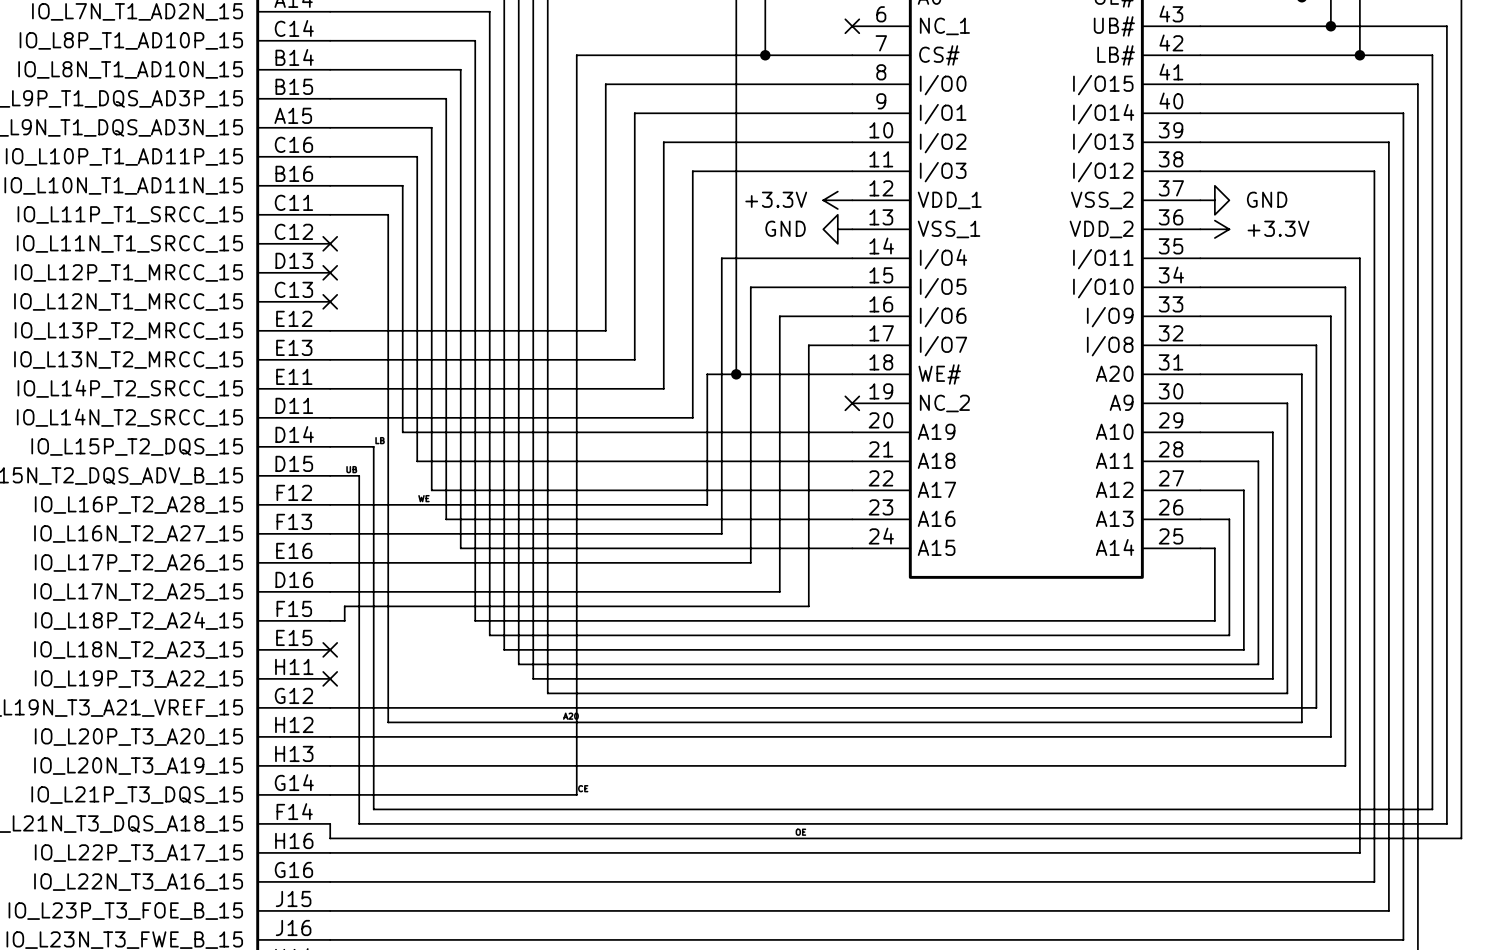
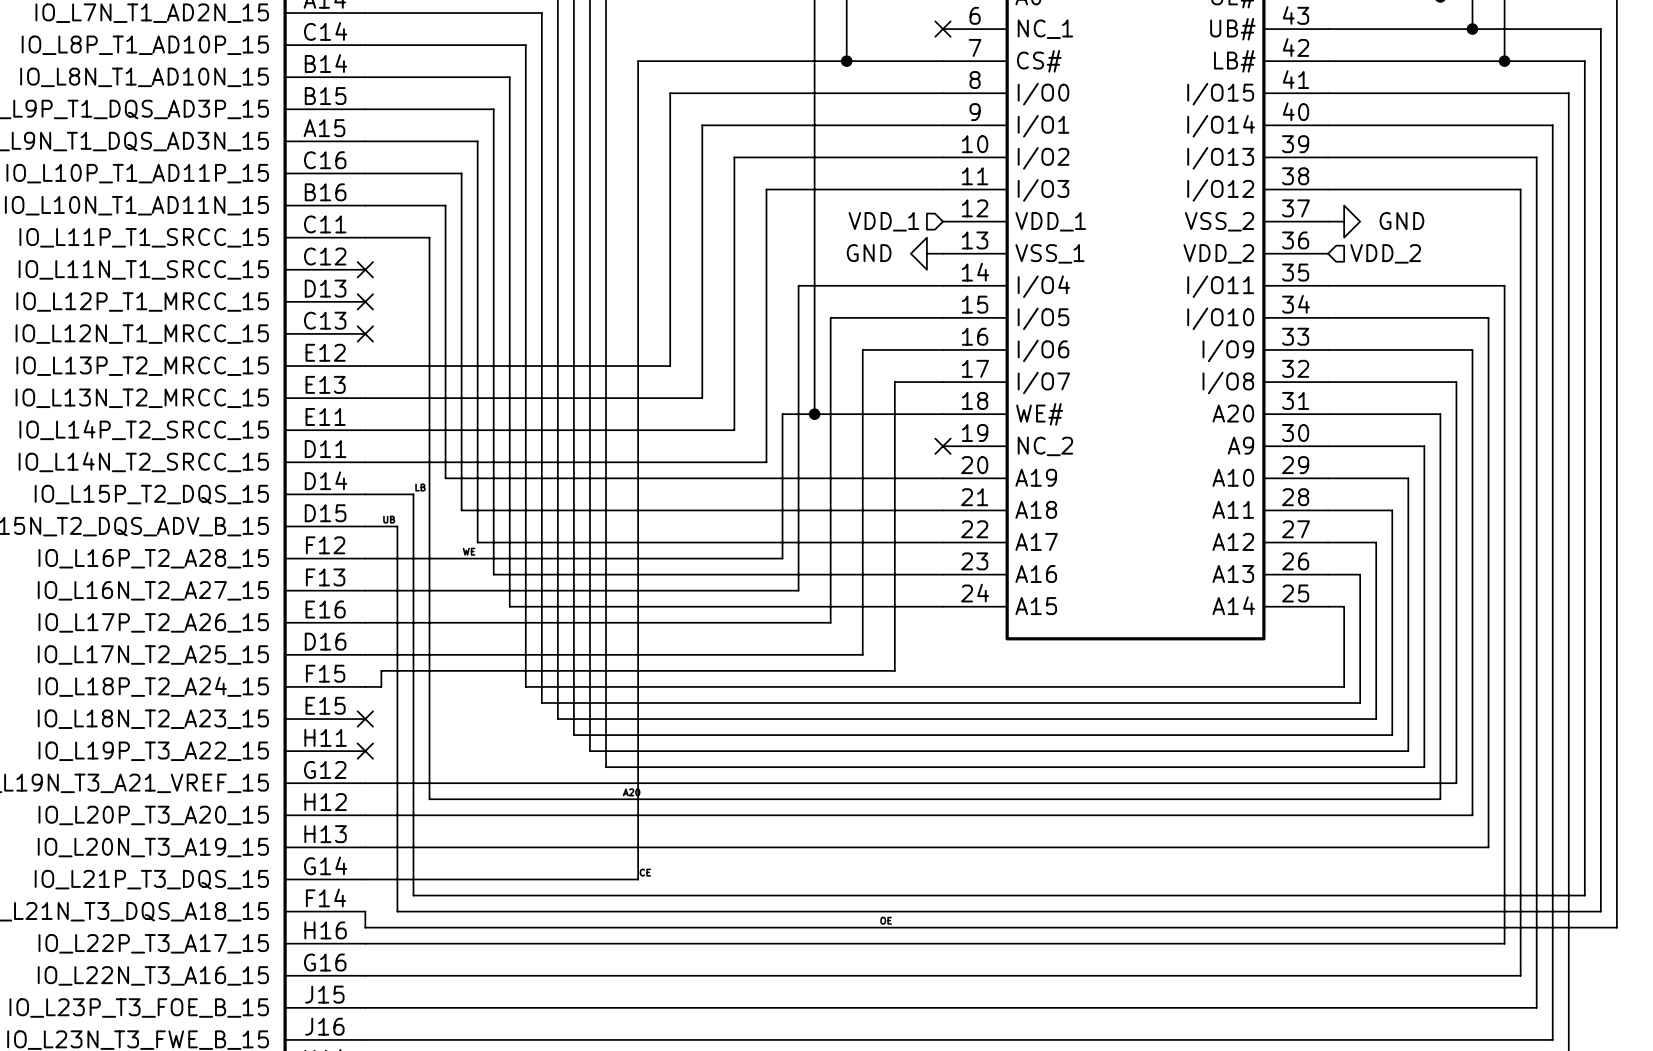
hierarchical label: none -> VDD_1 (883, 221)
power symbol: +3.3V (837, 200) -> none
power symbol: +3.3V (1214, 229) -> none
hierarchical label: none -> VDD_2 (1385, 253)

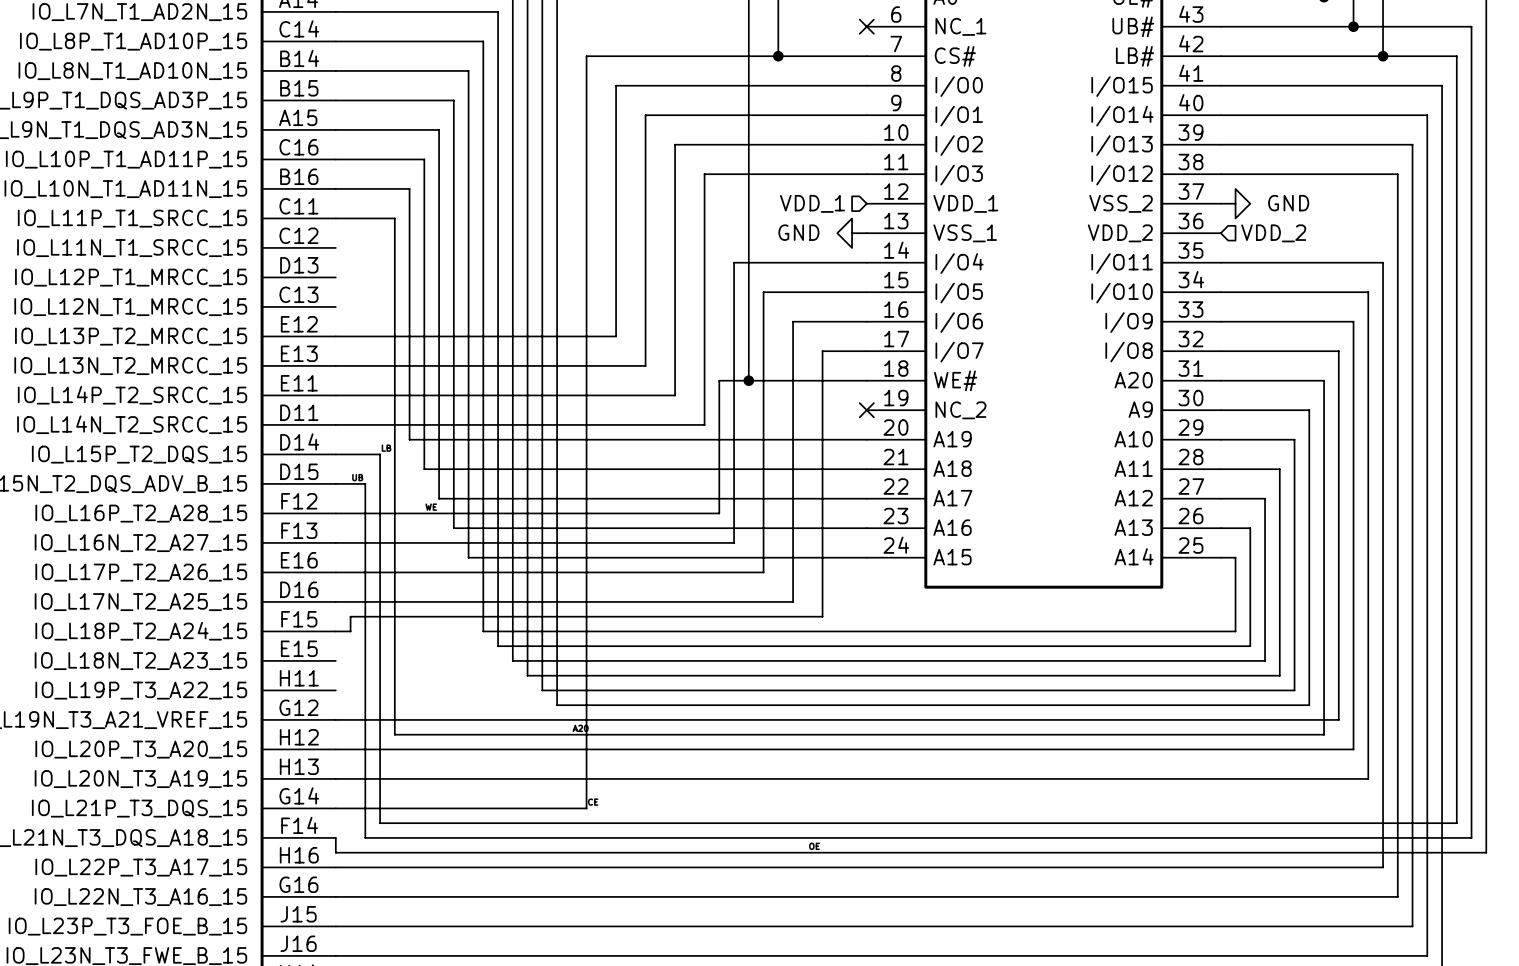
no-connect mark: (365, 269) -> none
no-connect mark: (365, 301) -> none
no-connect mark: (365, 333) -> none
no-connect mark: (365, 719) -> none
no-connect mark: (365, 751) -> none

